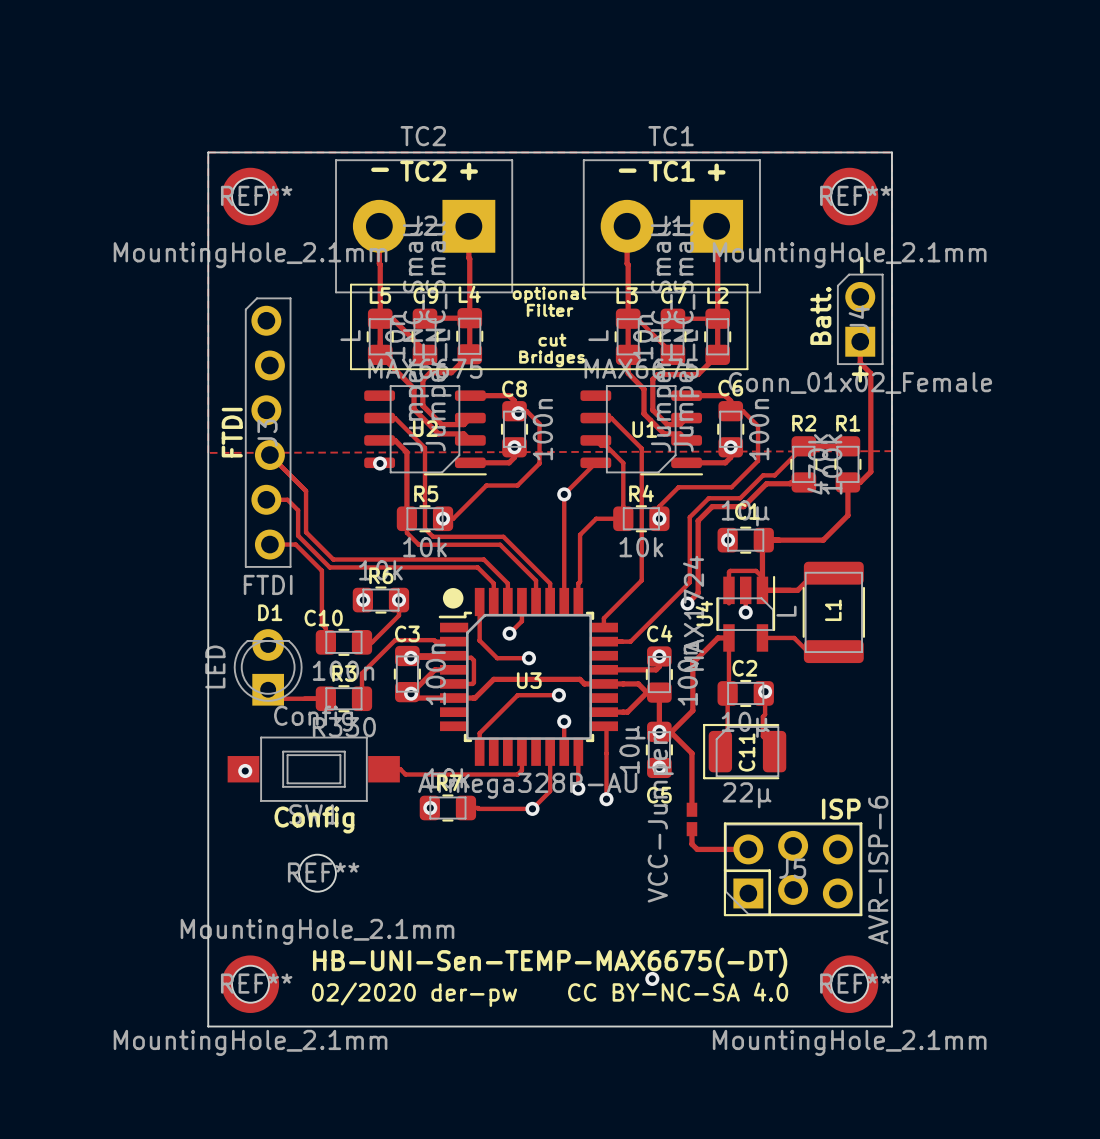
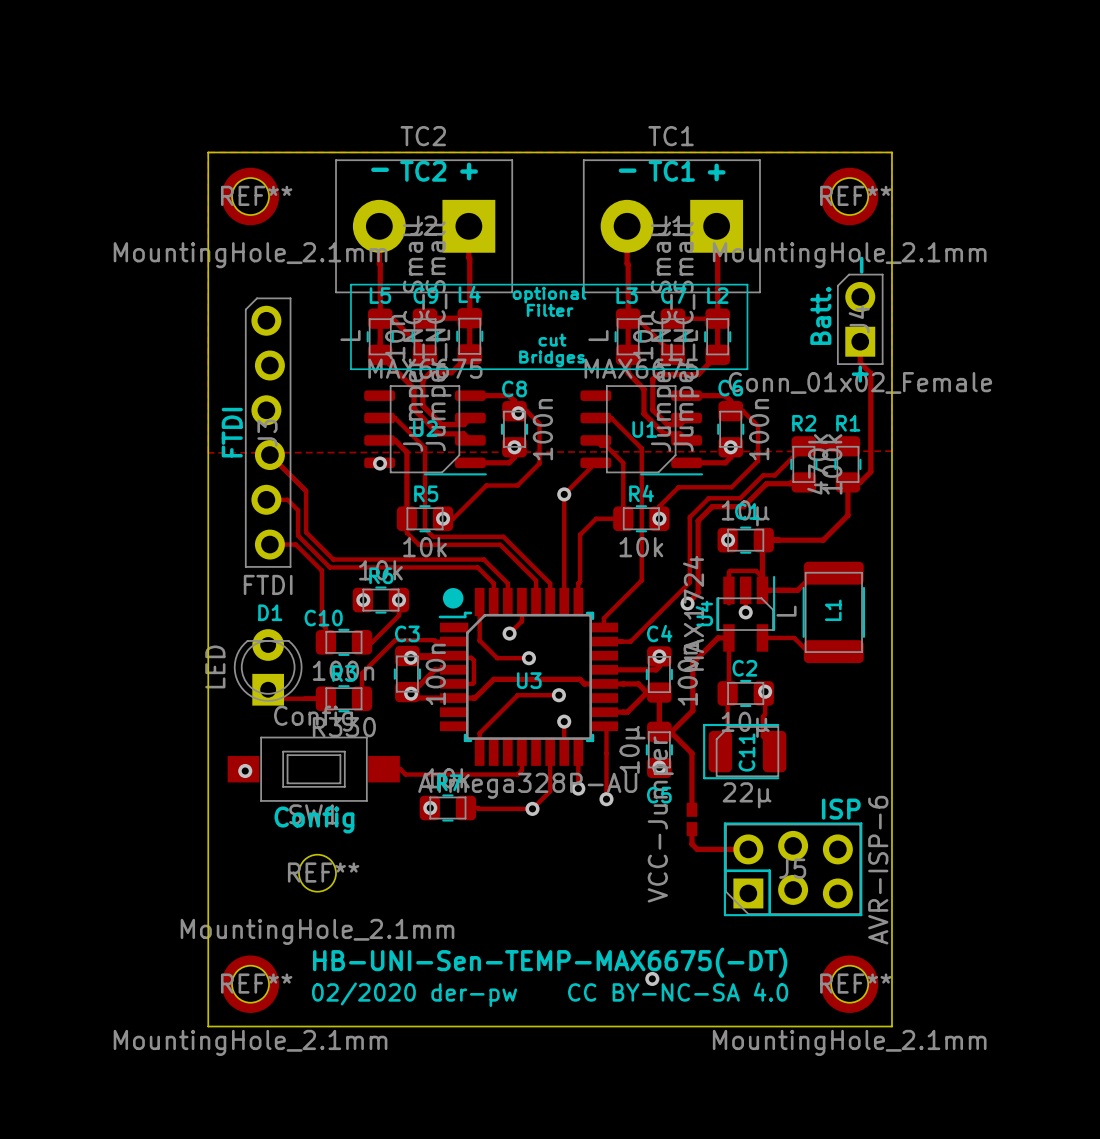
via: (659, 731) -> none

